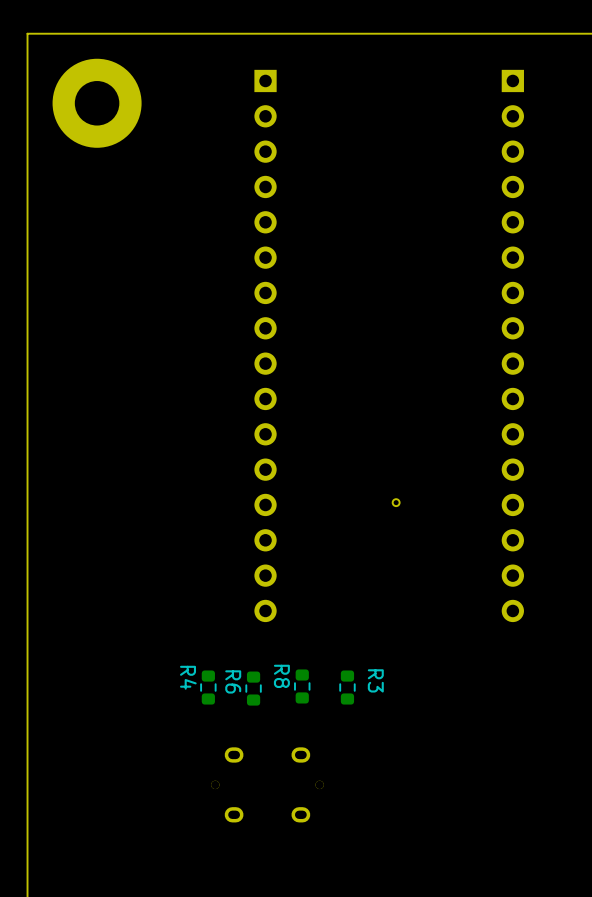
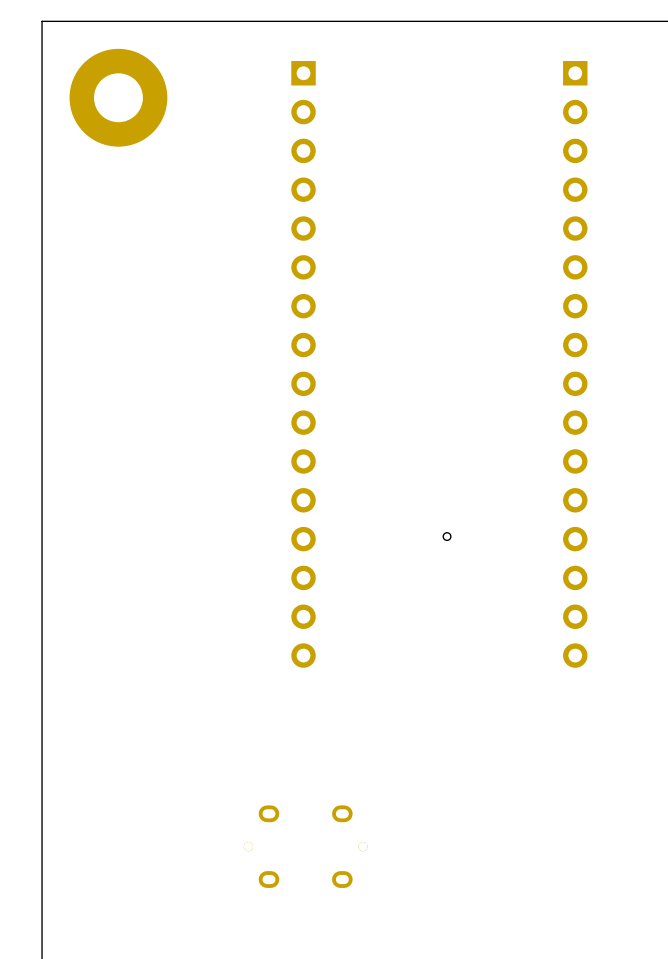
R8: (302, 686) -> none
R4: (208, 687) -> none
R3: (347, 687) -> none
R6: (253, 688) -> none

